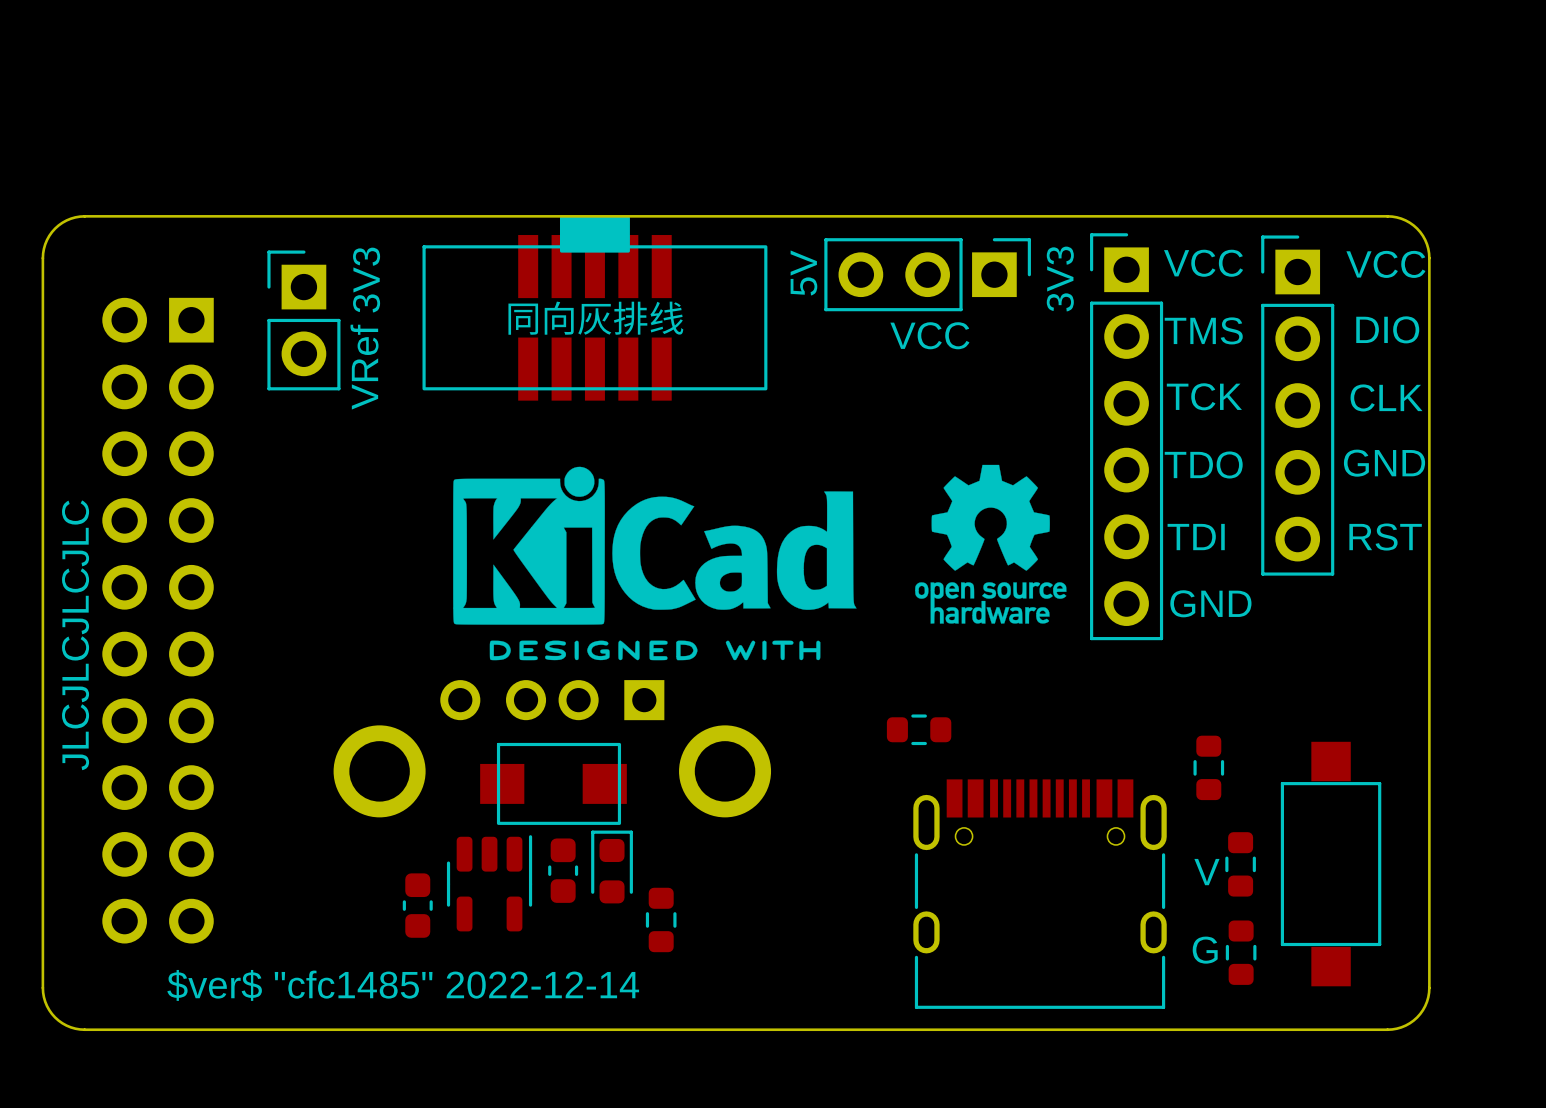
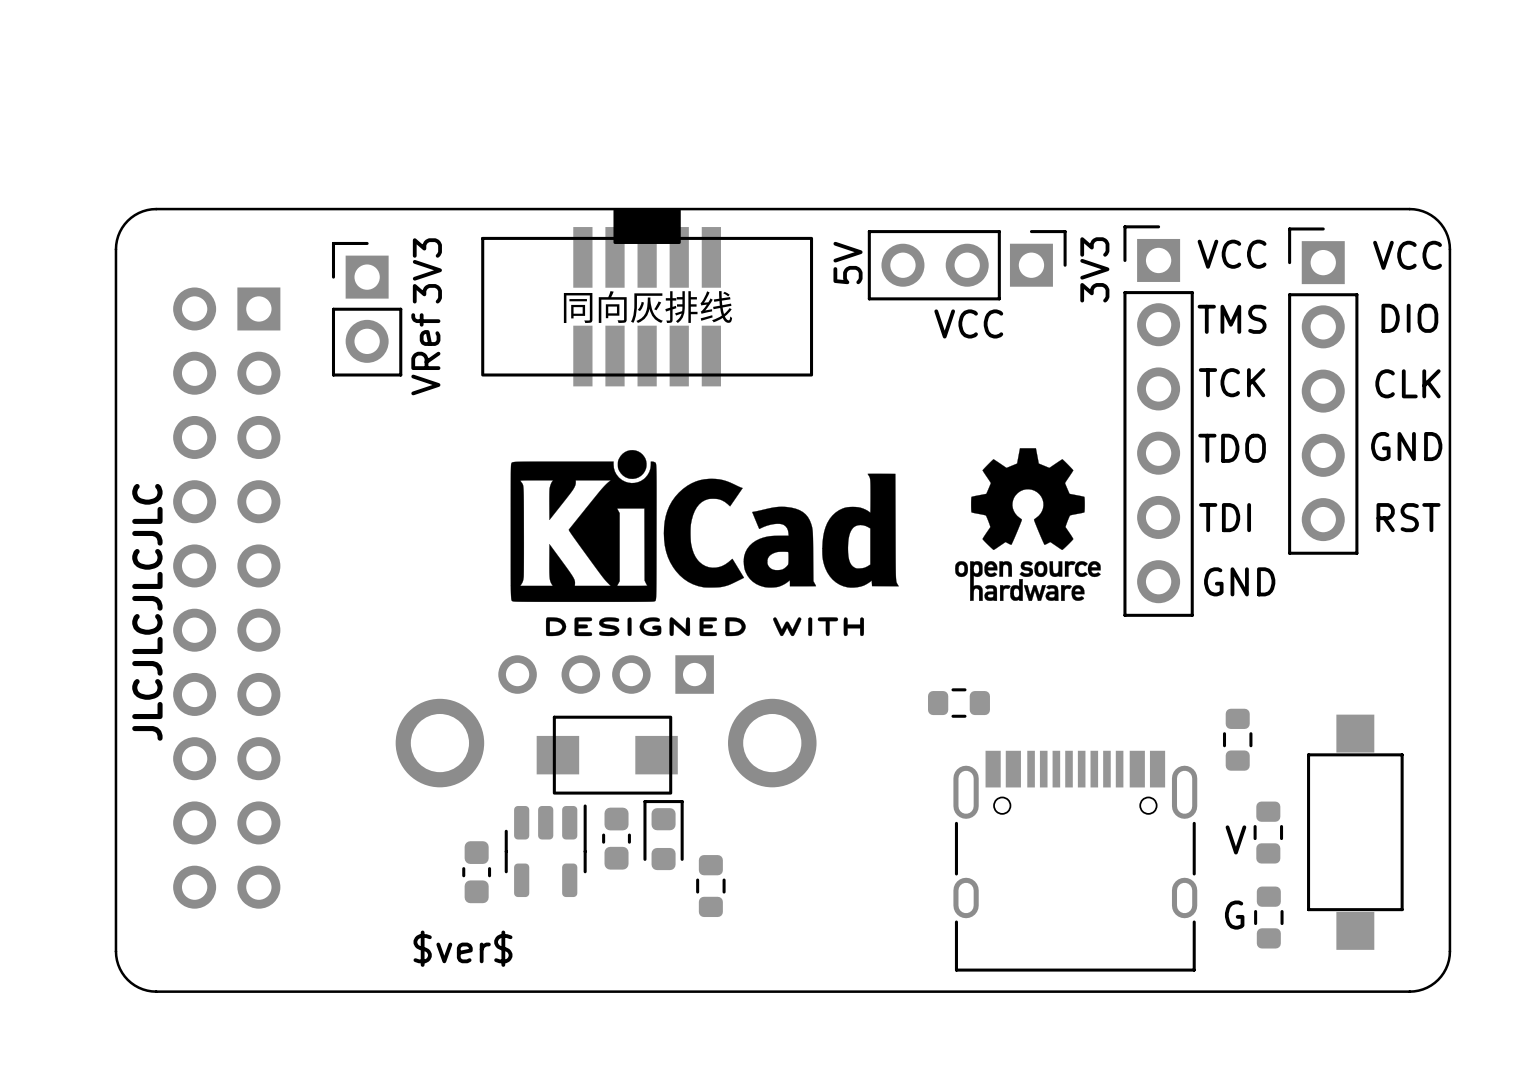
text: $ver$ "cfc1485" 2022-12-14 (403, 985) -> $ver$ (462, 948)

